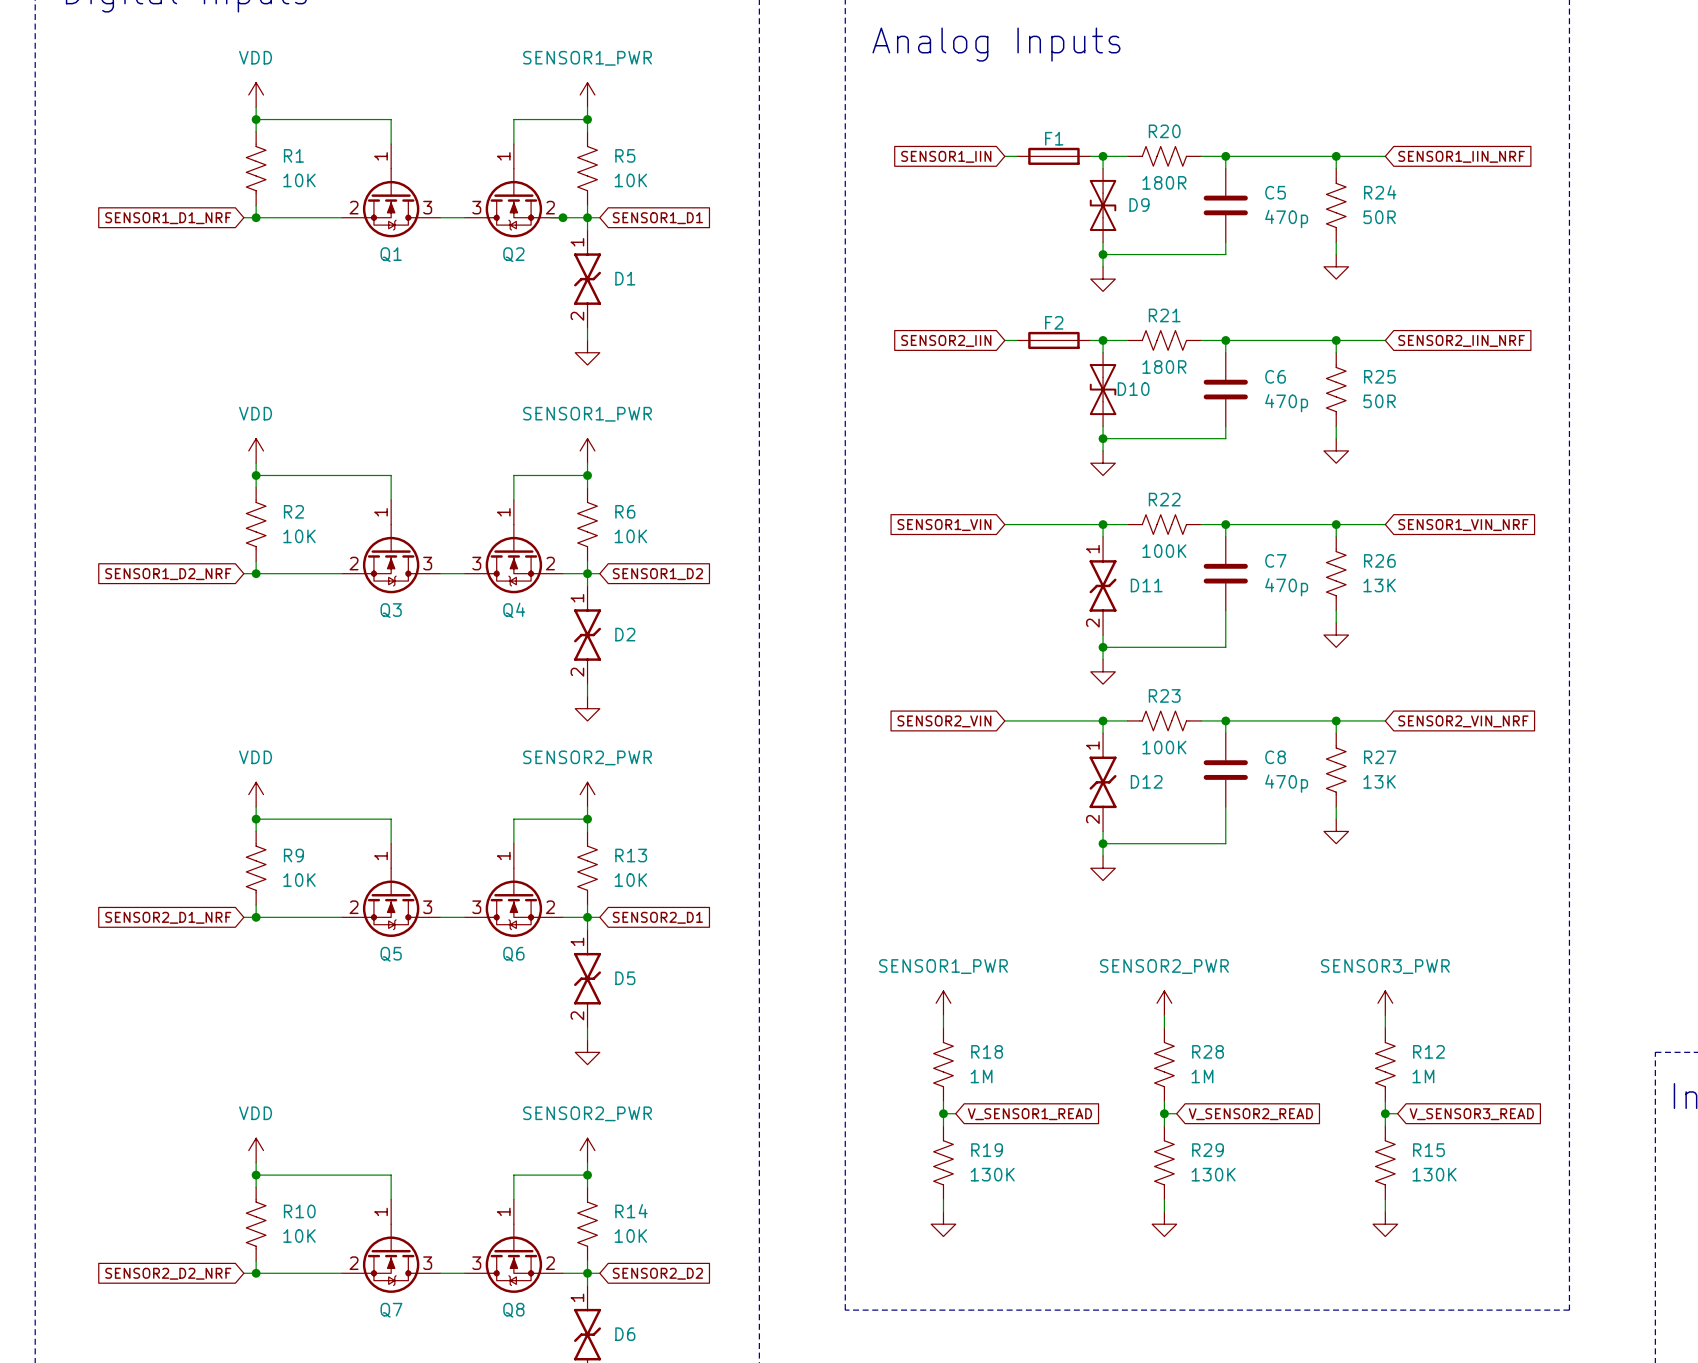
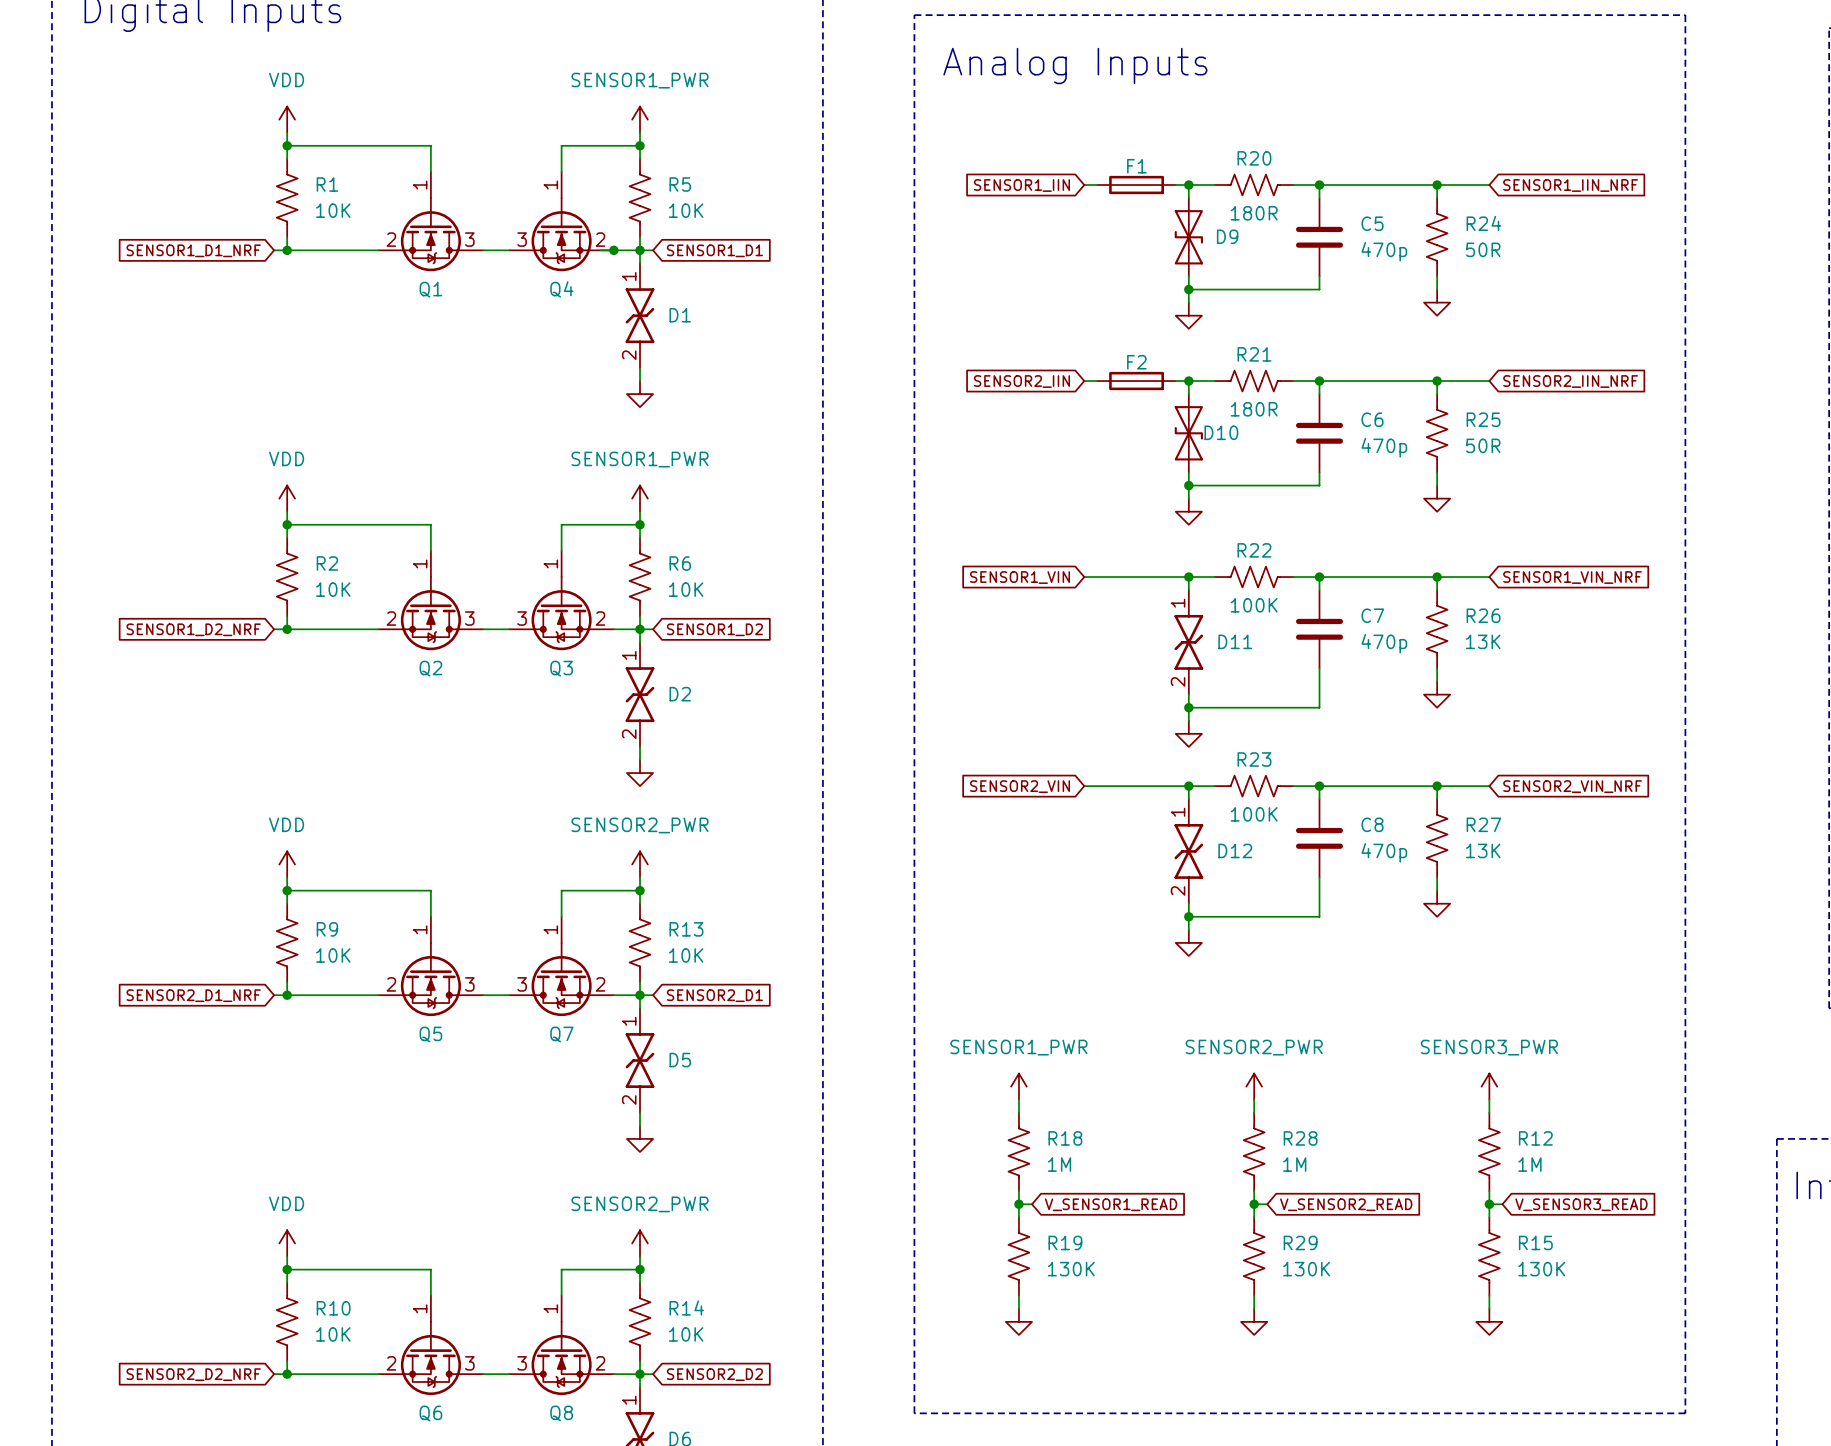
Q2 name: Q2 (513, 254) -> Q4 (561, 289)
Q3 name: Q3 (391, 610) -> Q2 (430, 668)
Q4 name: Q4 (514, 610) -> Q3 (561, 668)
Q6 name: Q6 (513, 954) -> Q7 (561, 1034)
Q7 name: Q7 (391, 1310) -> Q6 (430, 1413)

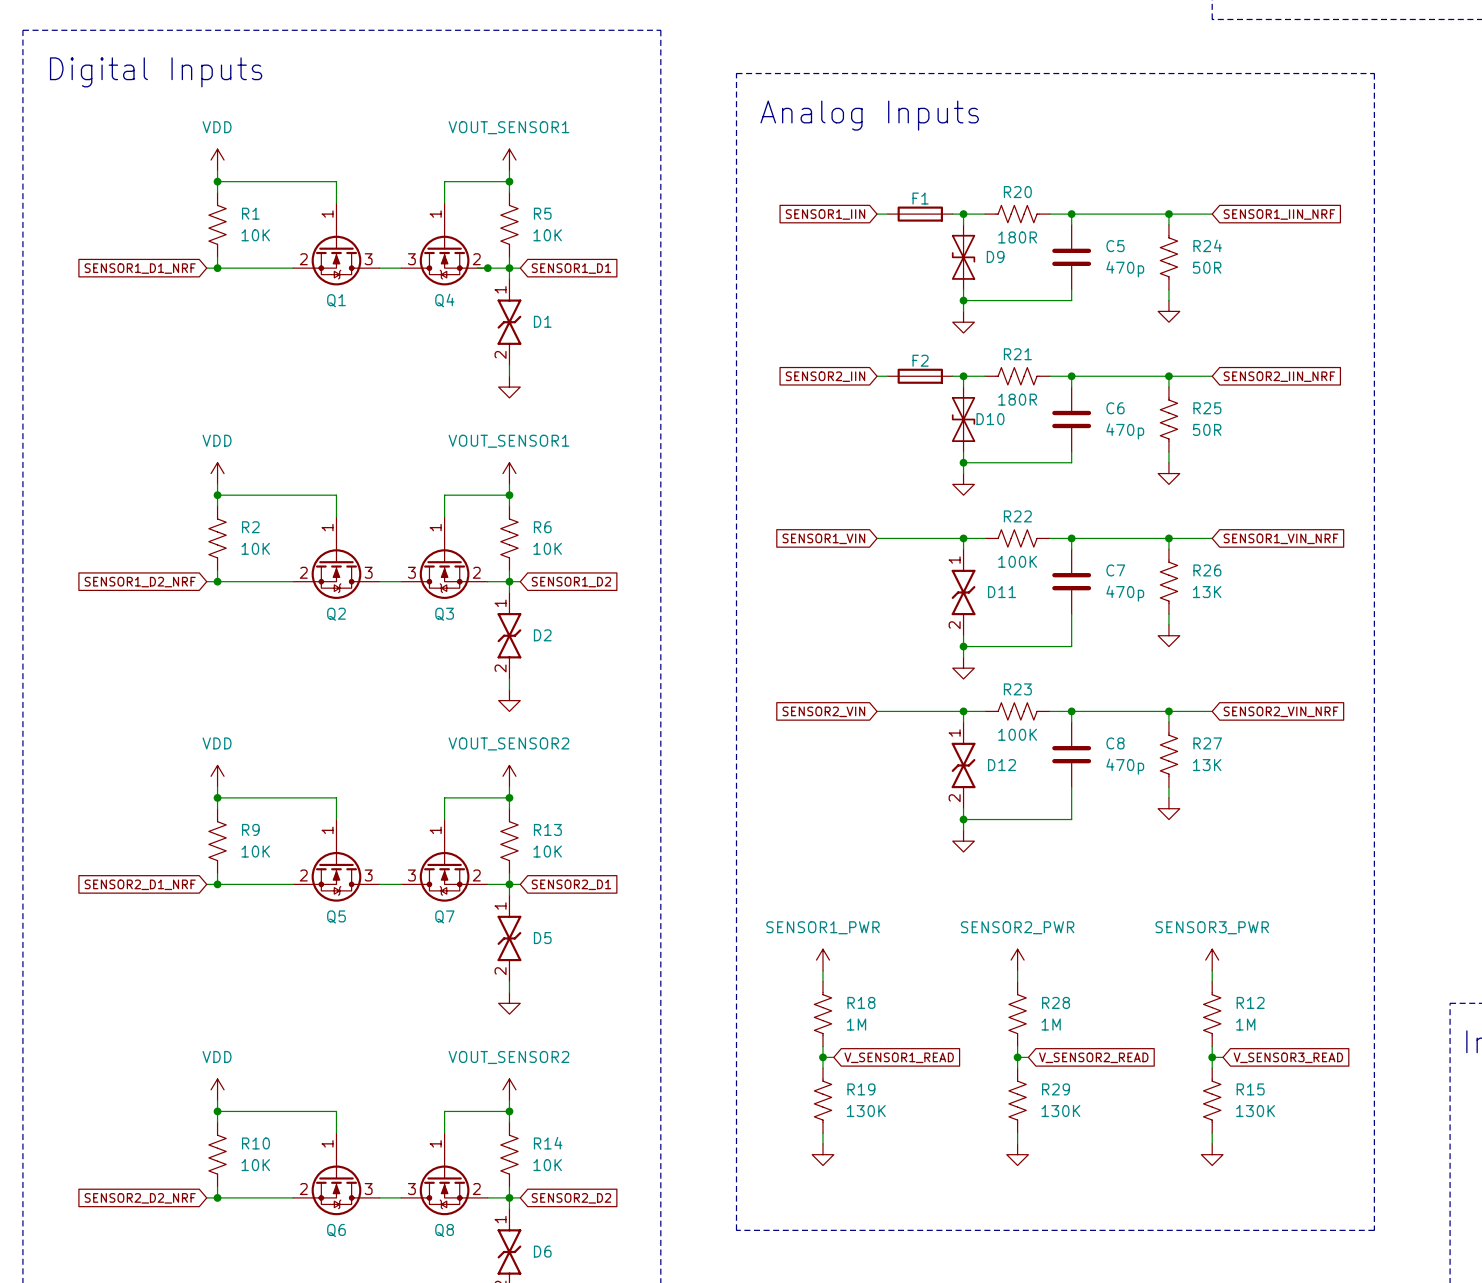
power symbol: SENSOR1_PWR (640, 119) -> VOUT_SENSOR1 (509, 160)
power symbol: SENSOR1_PWR (640, 498) -> VOUT_SENSOR1 (509, 473)
power symbol: SENSOR2_PWR (640, 864) -> VOUT_SENSOR2 (509, 776)
power symbol: SENSOR2_PWR (640, 1243) -> VOUT_SENSOR2 (509, 1089)

